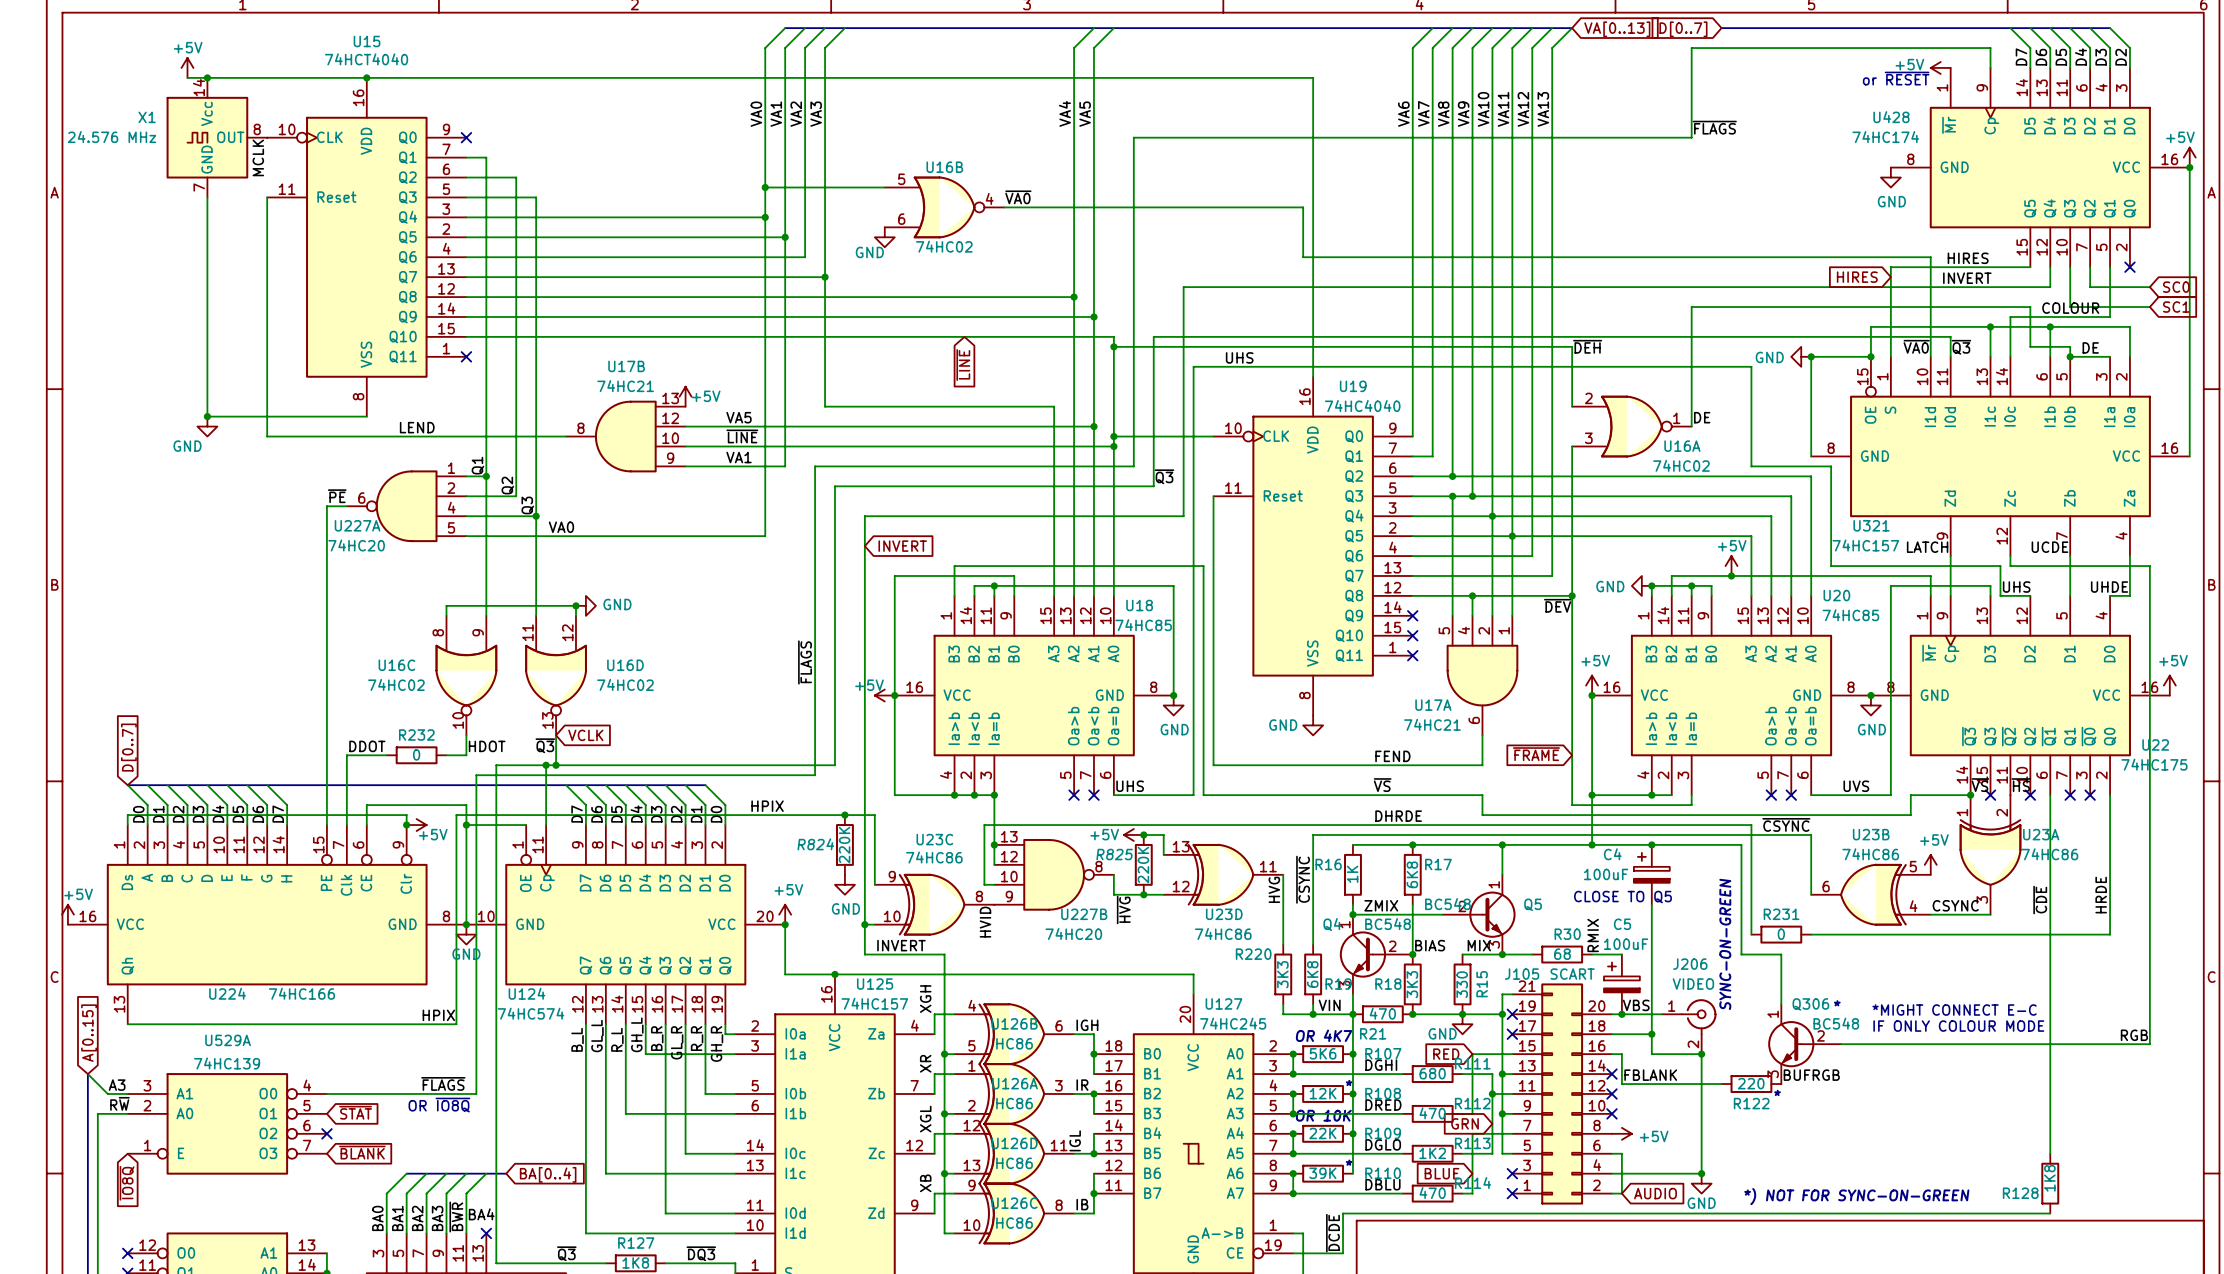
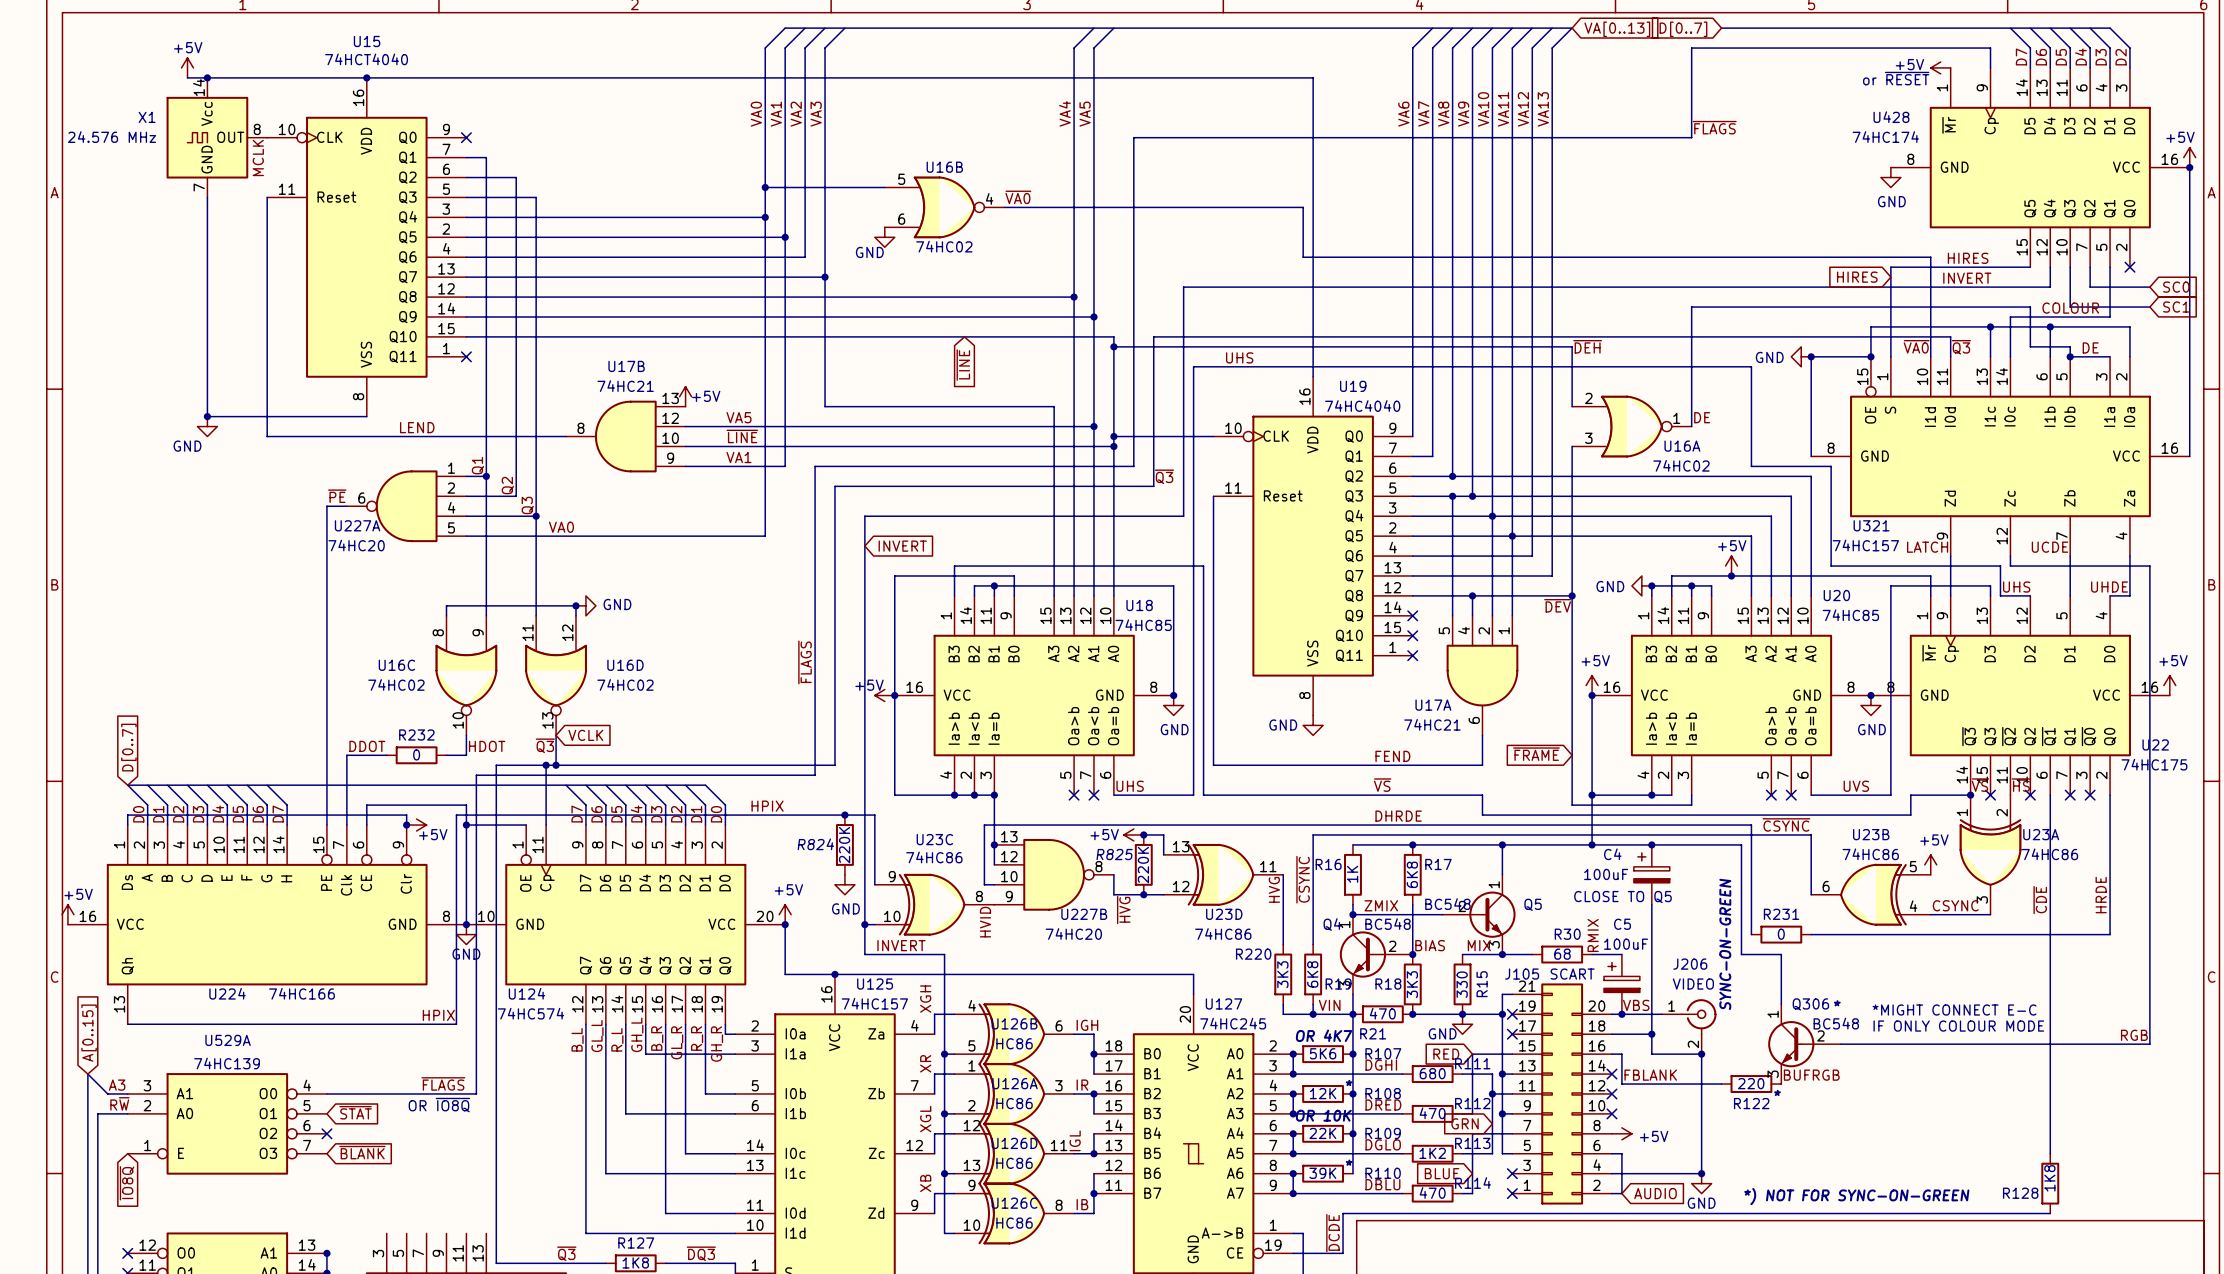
wire: (406, 1173) (386, 1193) (386, 1233) -> none
bus: (406, 1173) (506, 1173) -> none
wire: (426, 1173) (406, 1193) (406, 1233) -> none
wire: (446, 1173) (426, 1193) (426, 1233) -> none
wire: (466, 1173) (446, 1193) (446, 1233) -> none
wire: (486, 1173) (466, 1193) (466, 1233) -> none
global label: BA[0..4] (548, 1174) -> none
label: BA4 (481, 1214) -> none
label: ~{BWR} (456, 1217) -> none
label: BA0 (377, 1218) -> none
label: BA1 (397, 1218) -> none
label: BA2 (417, 1218) -> none
label: BA3 (437, 1218) -> none
no-connect mark: (486, 1233) -> none
junction: none -> (326, 1253)

